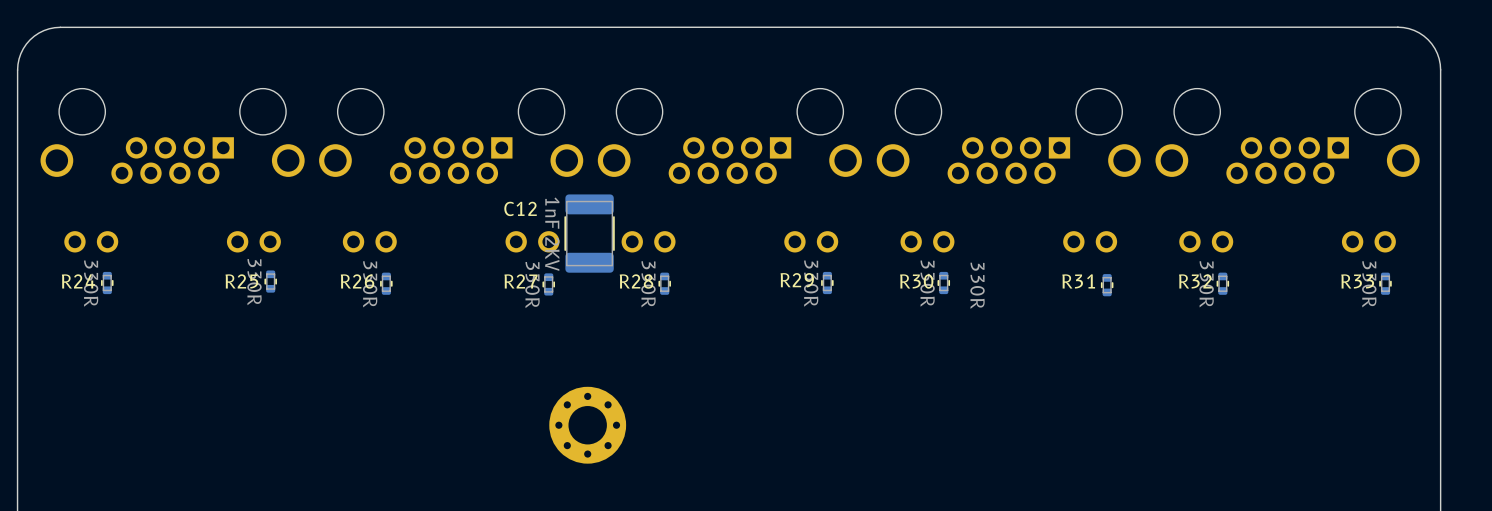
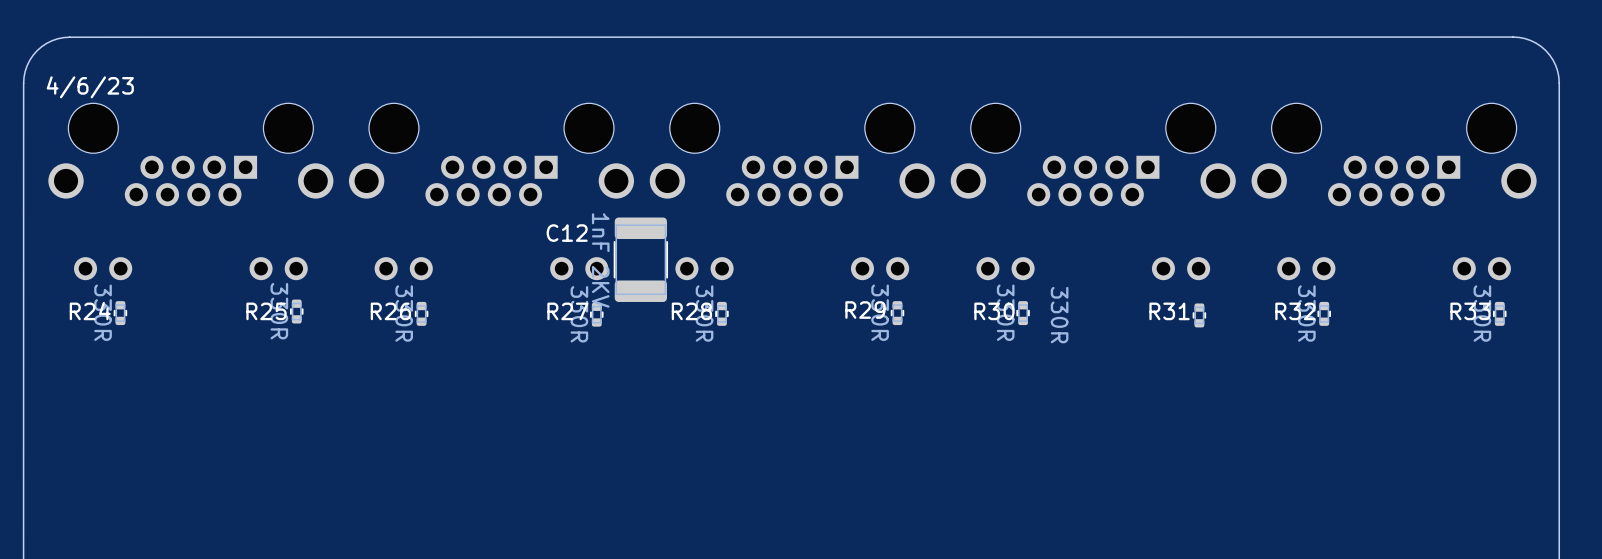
text: none -> 4/6/23 (90, 87)
part: (587, 425) -> none

